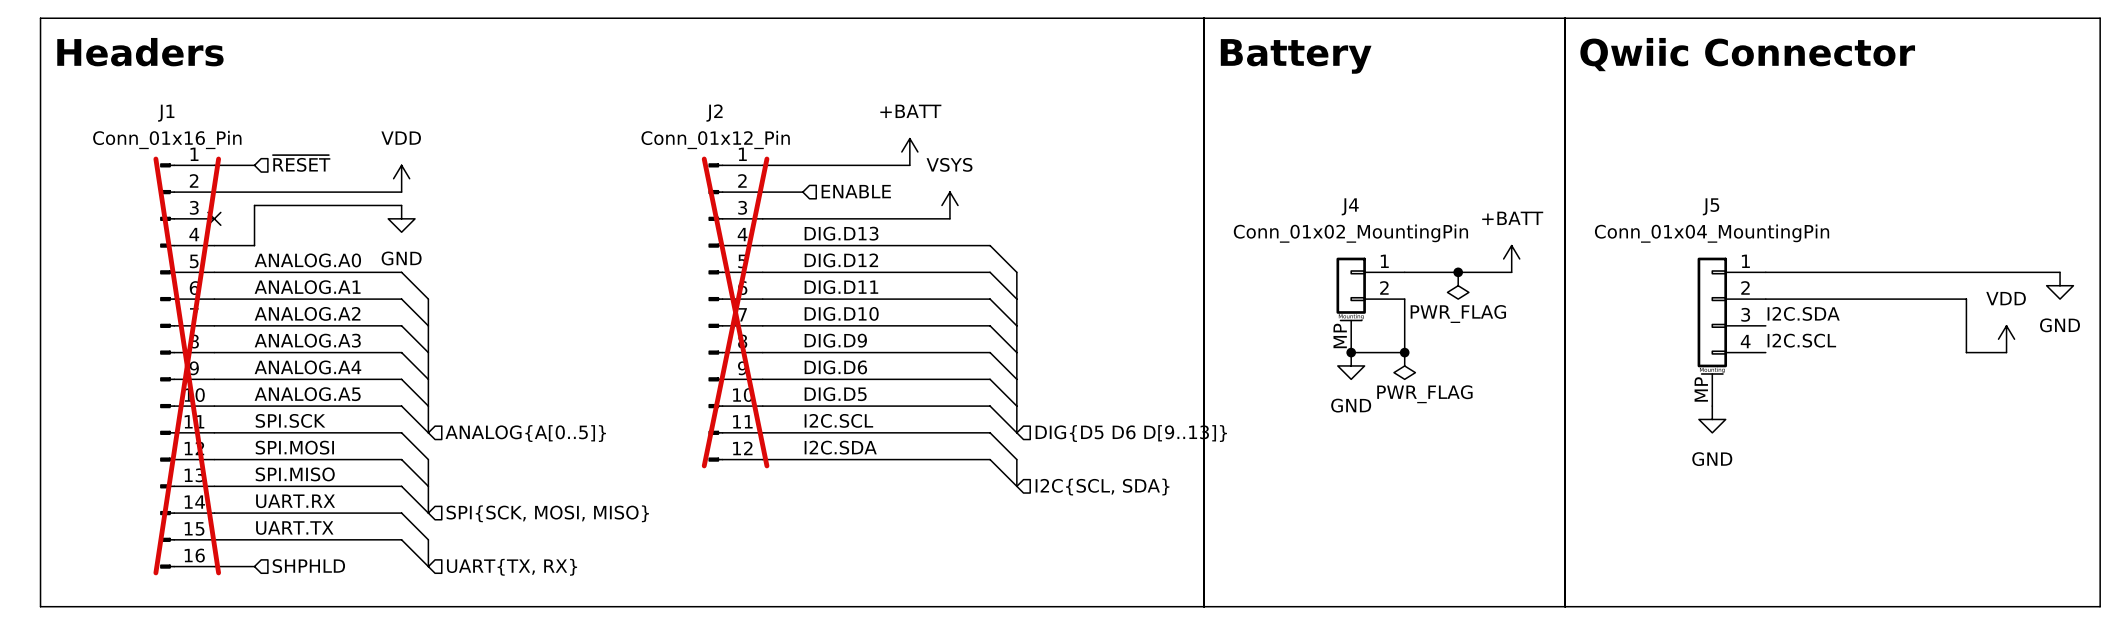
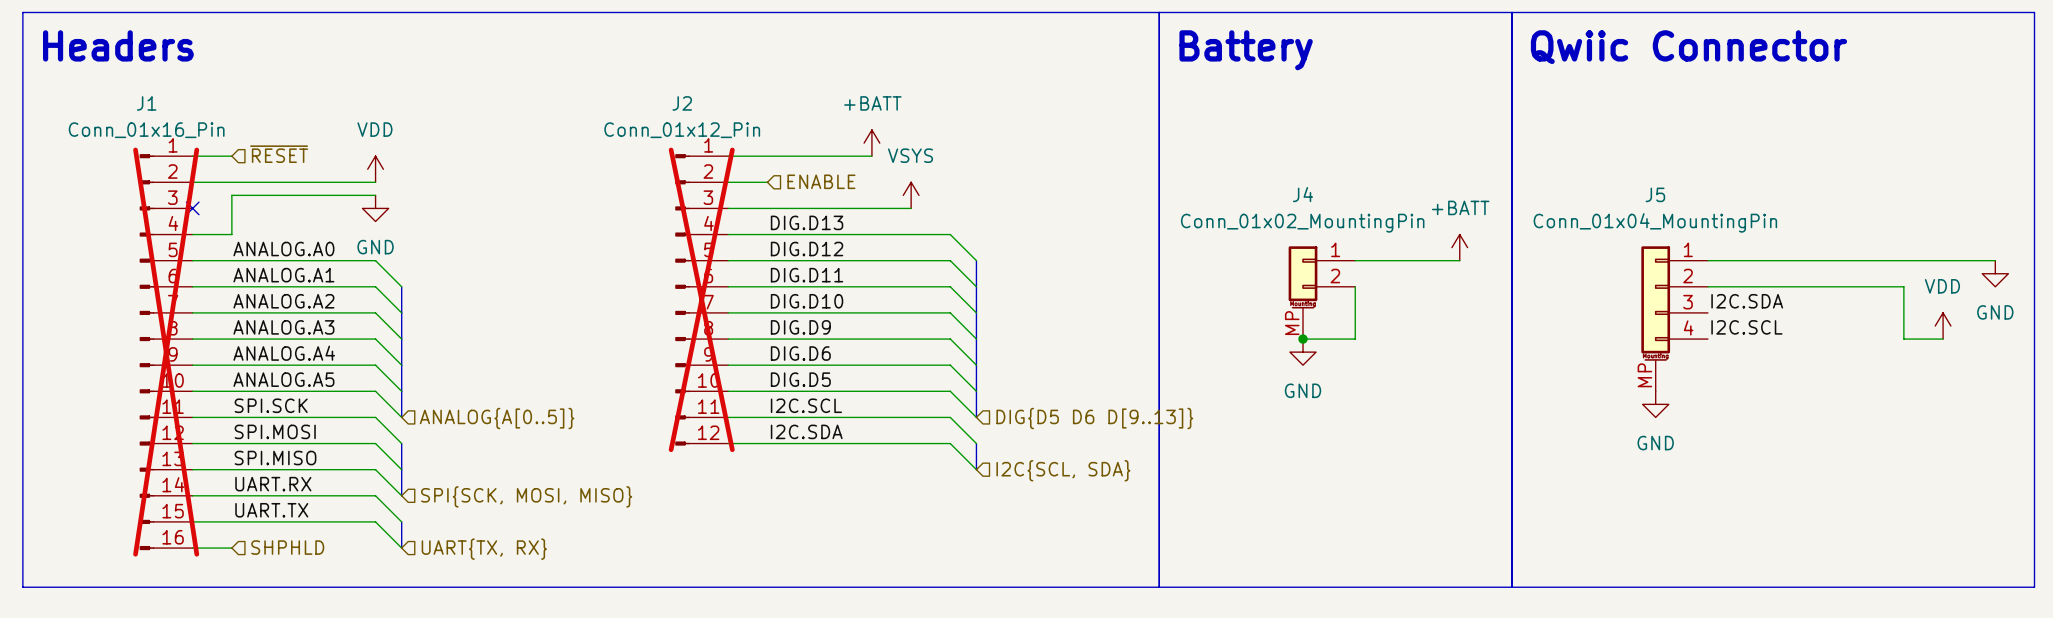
junction: (1458, 272) -> none
power symbol: PWR_FLAG (1458, 285) -> none
junction: (1404, 352) -> none
power symbol: PWR_FLAG (1404, 365) -> none

